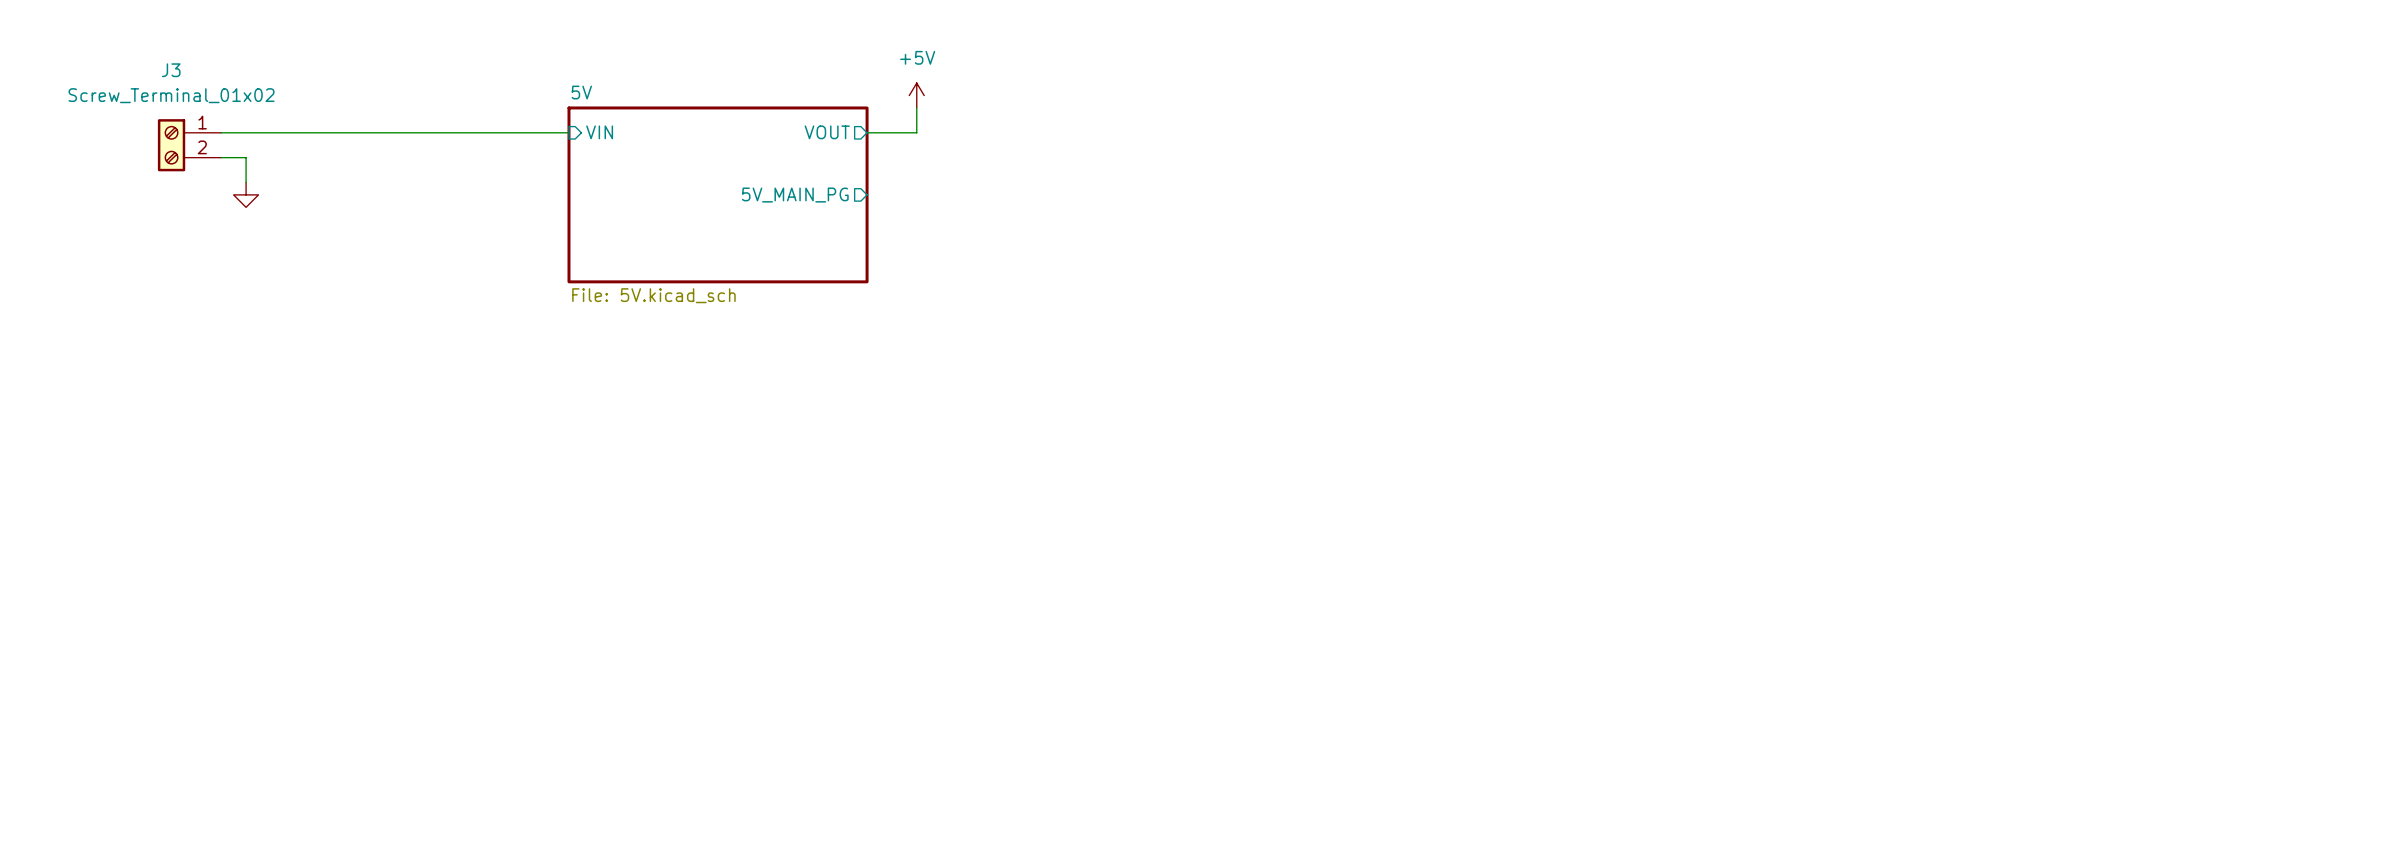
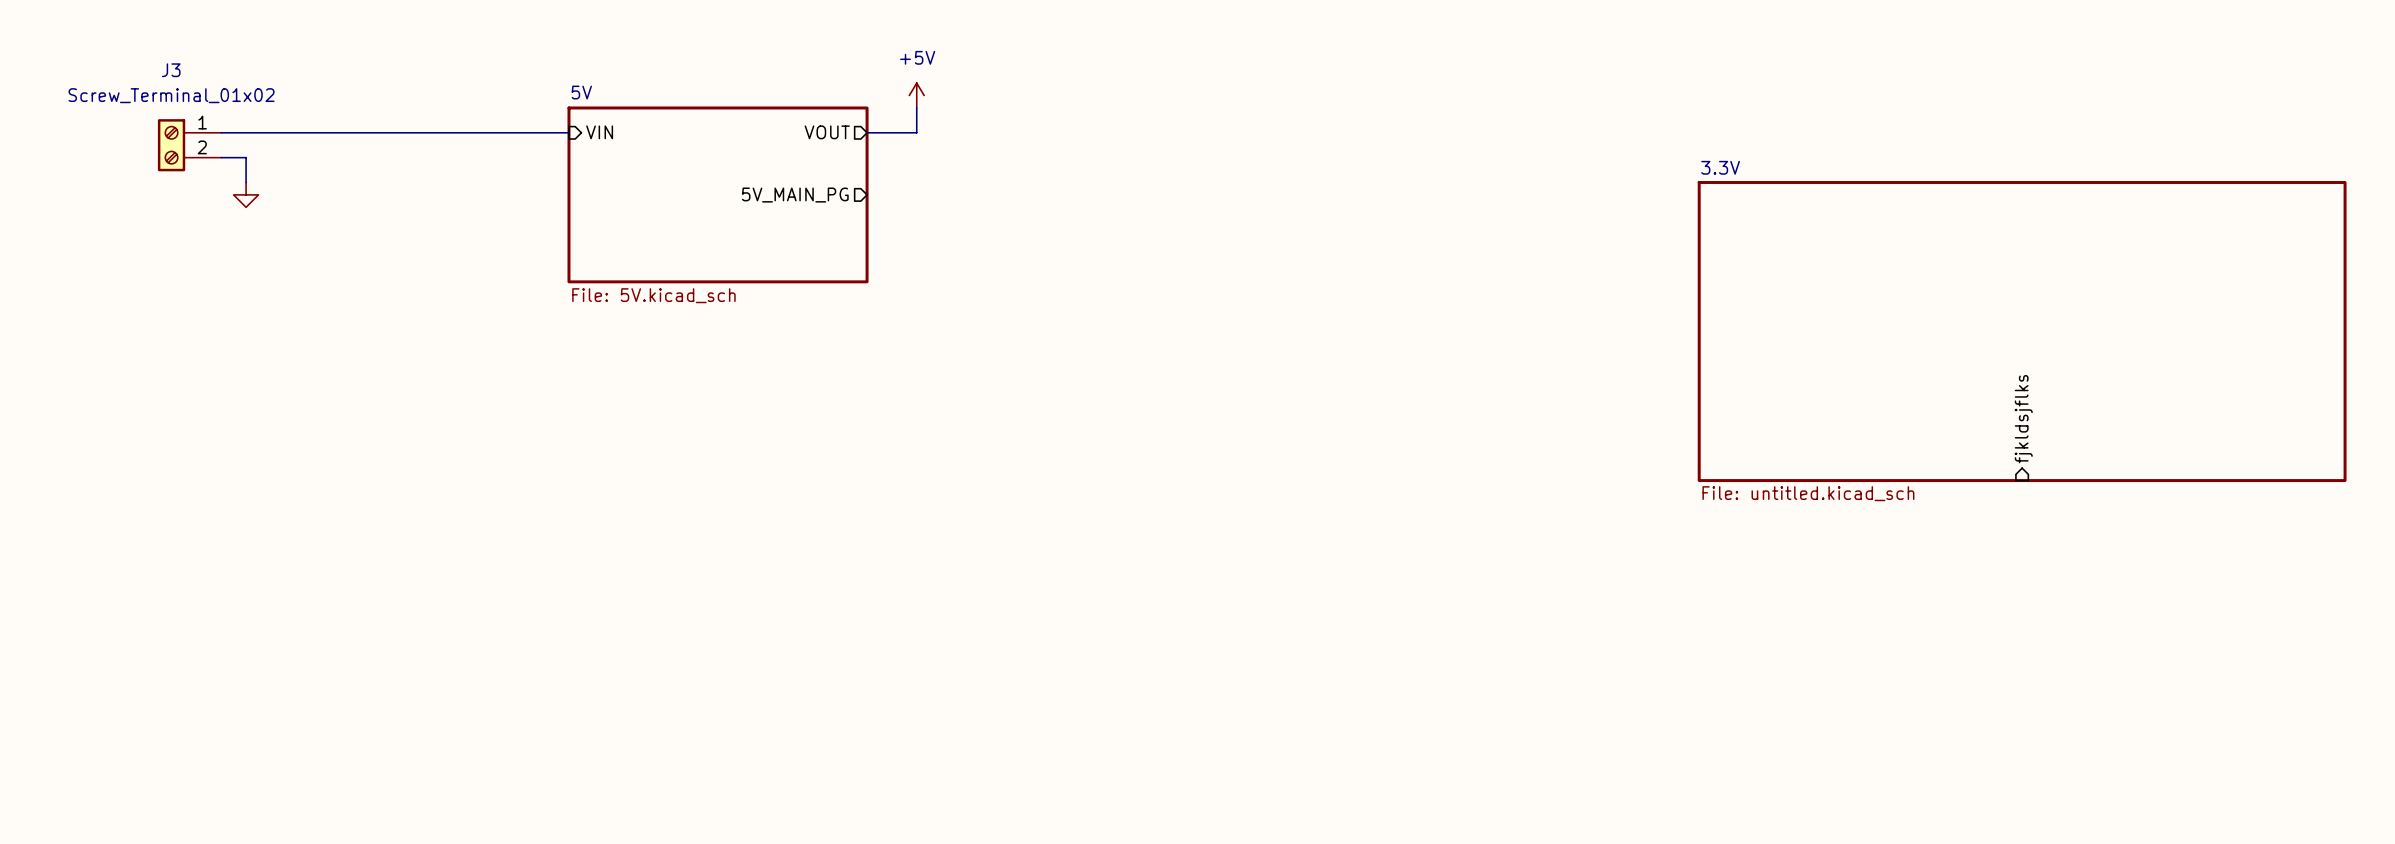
sheet 3.3V: none -> File: untitled.kicad_sch (2022, 331)
sheet pin: none -> fjkldsjflks (2023, 419)

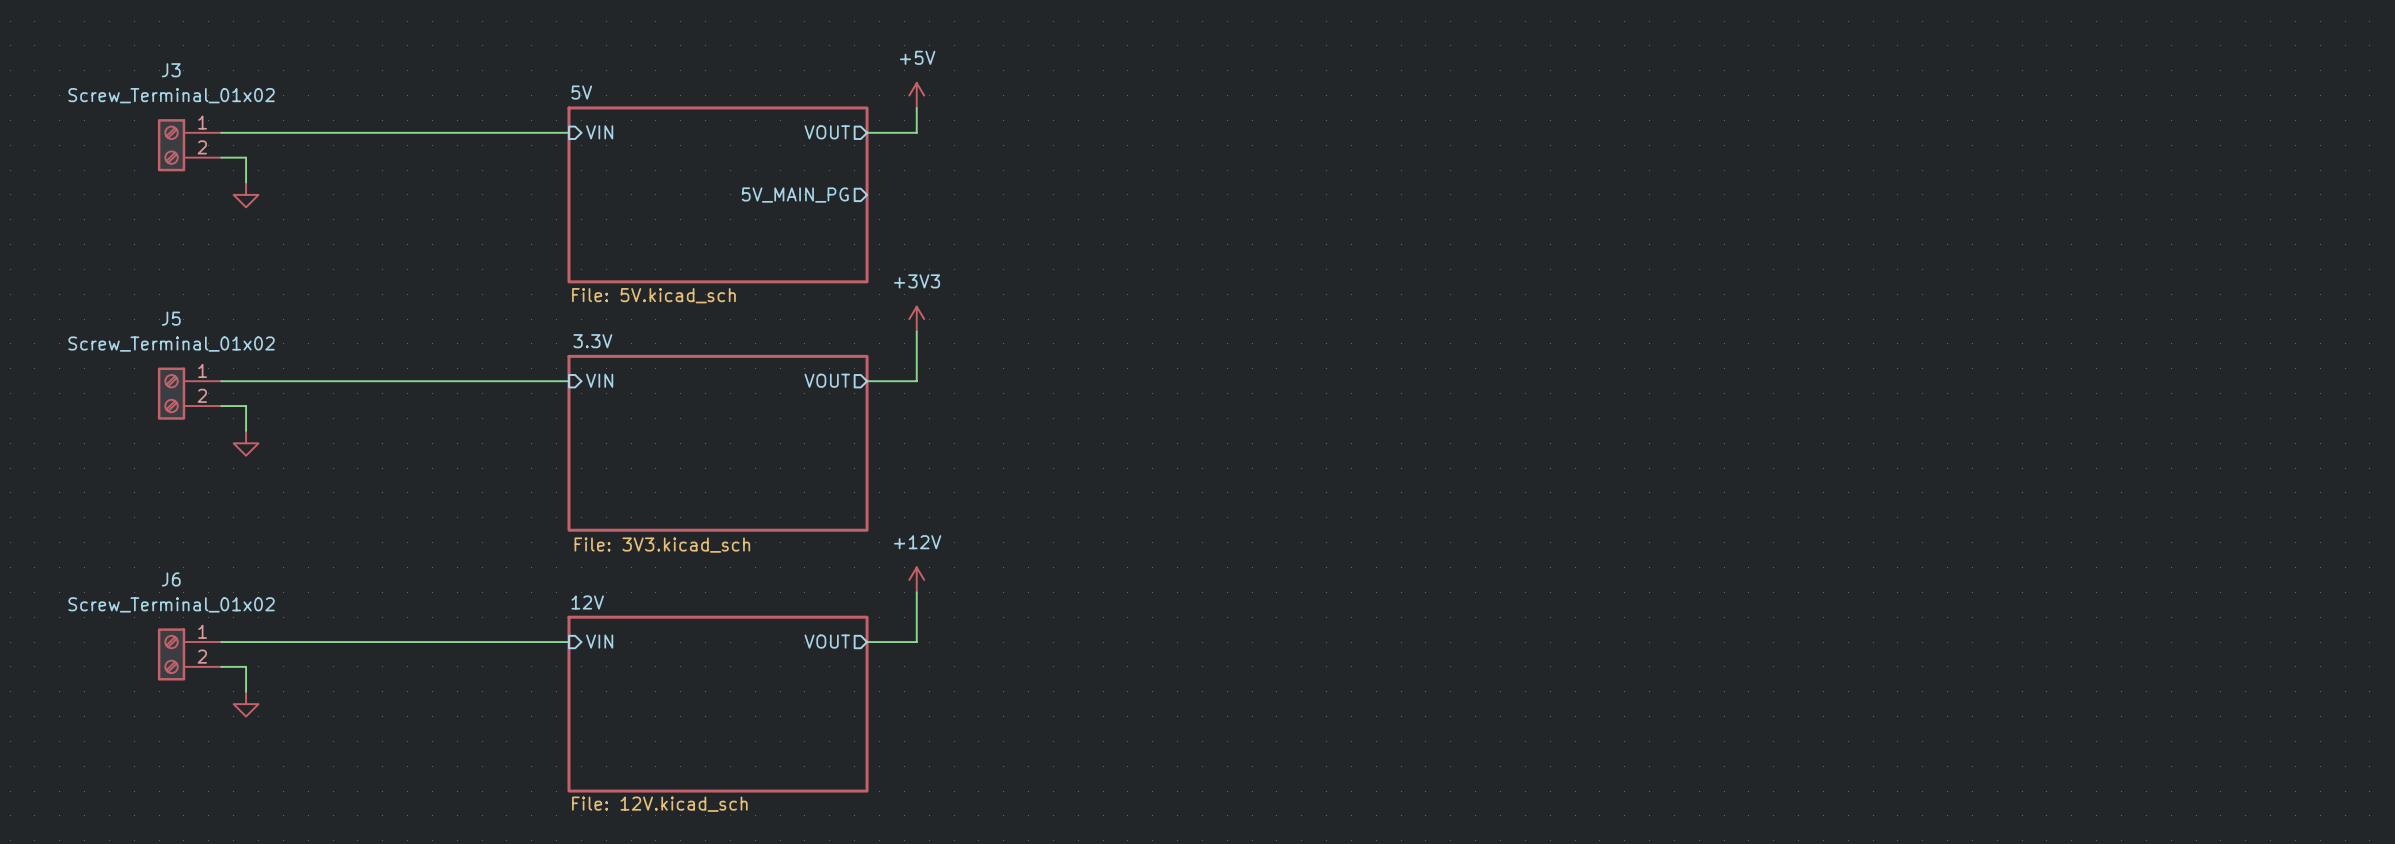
sheet 3.3V name position: 3.3V (1720, 167) -> 3.3V (592, 341)
sheet 3.3V shape: [1697, 181, 2347, 483] -> [567, 354, 869, 532]
power symbol: none -> +3V3 (916, 319)
wire: none -> (916, 331) (916, 381) (867, 381)
sheet pin: none -> VIN (599, 380)
sheet pin: none -> VOUT (827, 380)
wire: none -> (221, 381) (568, 381)
J5: none -> Screw_Terminal_01x02 (189, 393)
wire: none -> (221, 406) (246, 406) (246, 430)
sheet pin: fjkldsjflks (2023, 419) -> none
power symbol: none -> (246, 443)
sheet 3.3V value: File: untitled.kicad_sch (1808, 493) -> File: 3V3.kicad_sch (662, 545)
power symbol: none -> +12V (916, 579)
wire: none -> (916, 592) (916, 642) (867, 642)
sheet pin: none -> VIN (599, 641)
sheet pin: none -> VOUT (827, 641)
wire: none -> (221, 642) (568, 642)
J6: none -> Screw_Terminal_01x02 (189, 654)
wire: none -> (221, 666) (246, 666) (246, 691)
power symbol: none -> (246, 704)
sheet 12V: none -> File: 12V.kicad_sch (718, 704)

